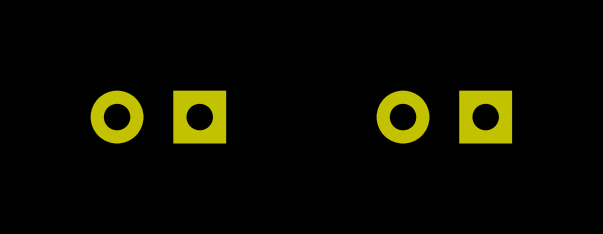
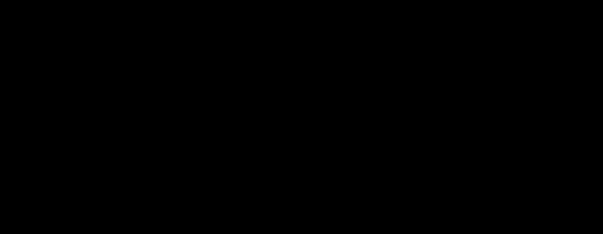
part: (158, 117) -> none
part: (444, 117) -> none

